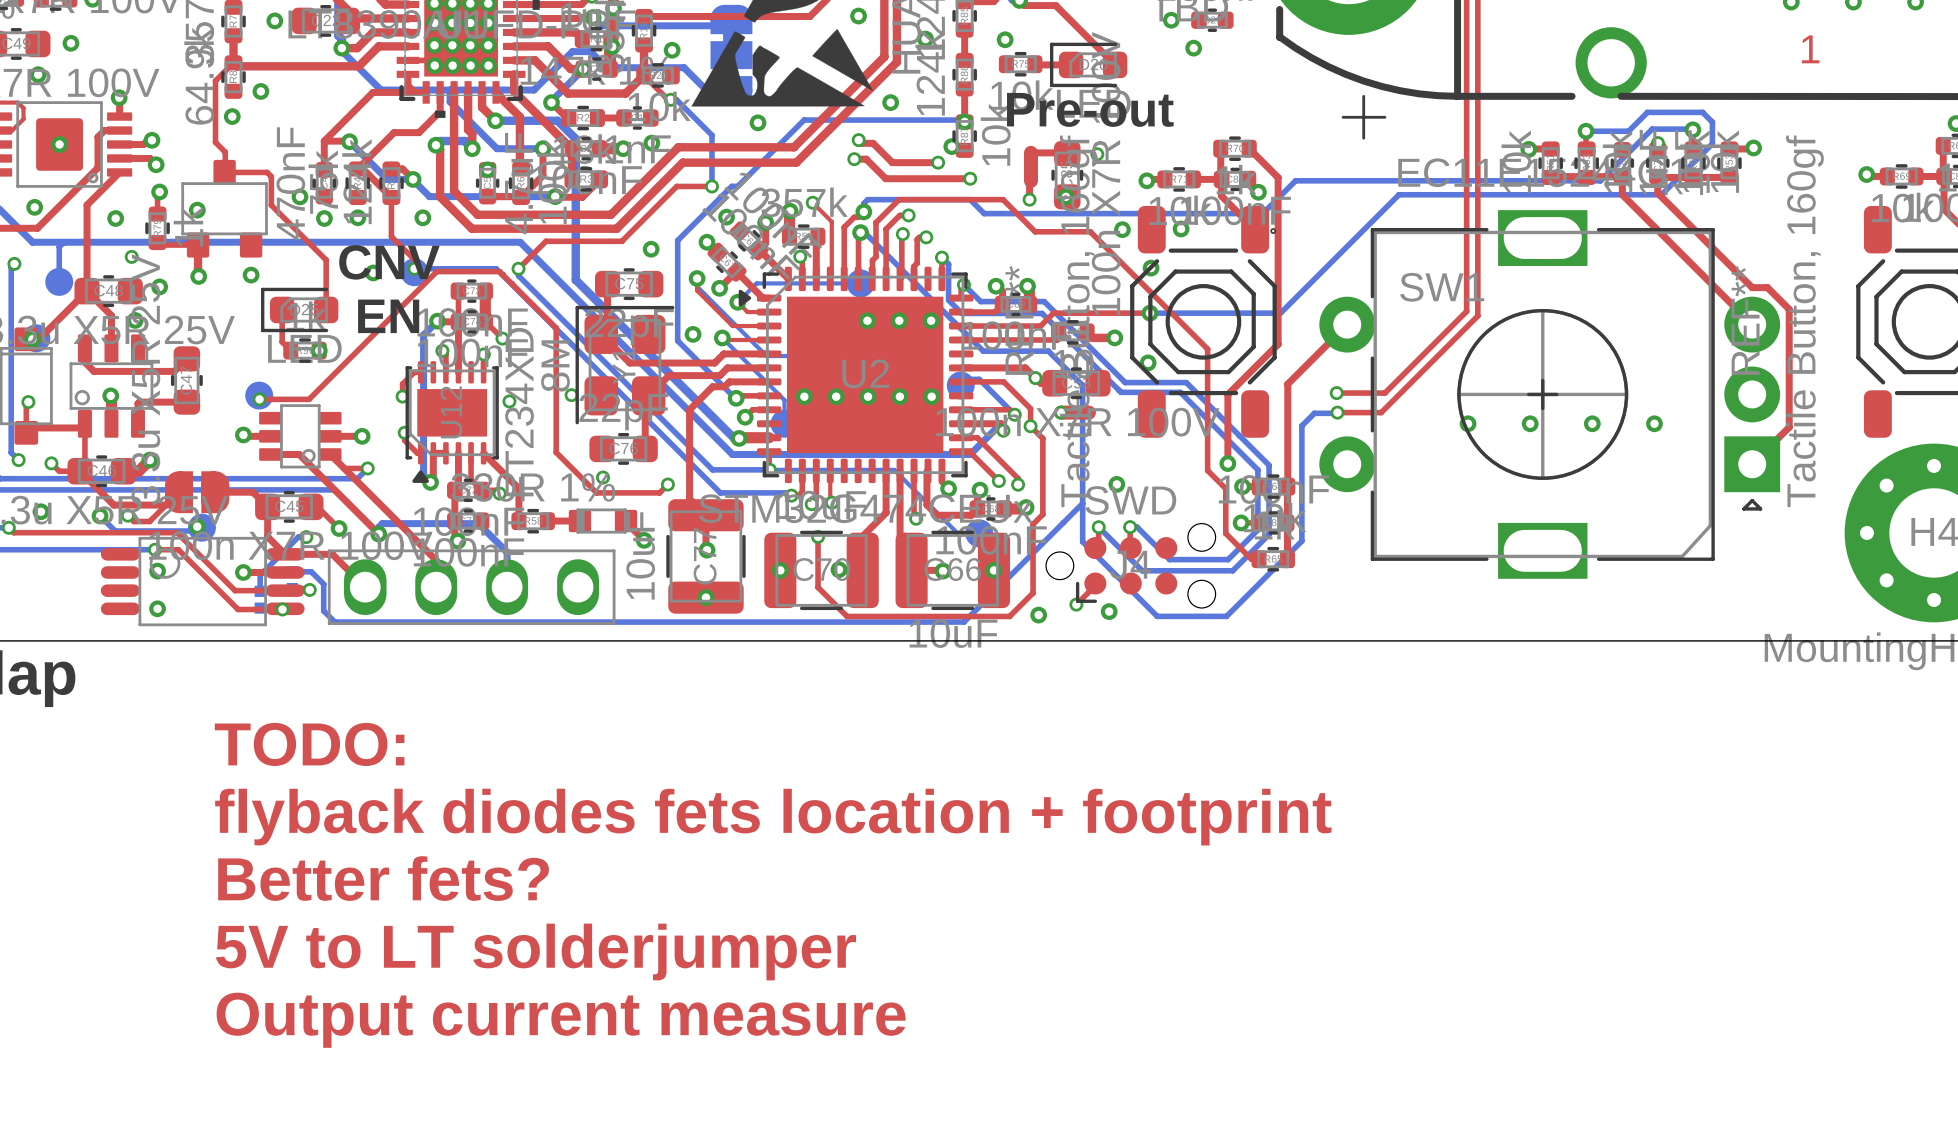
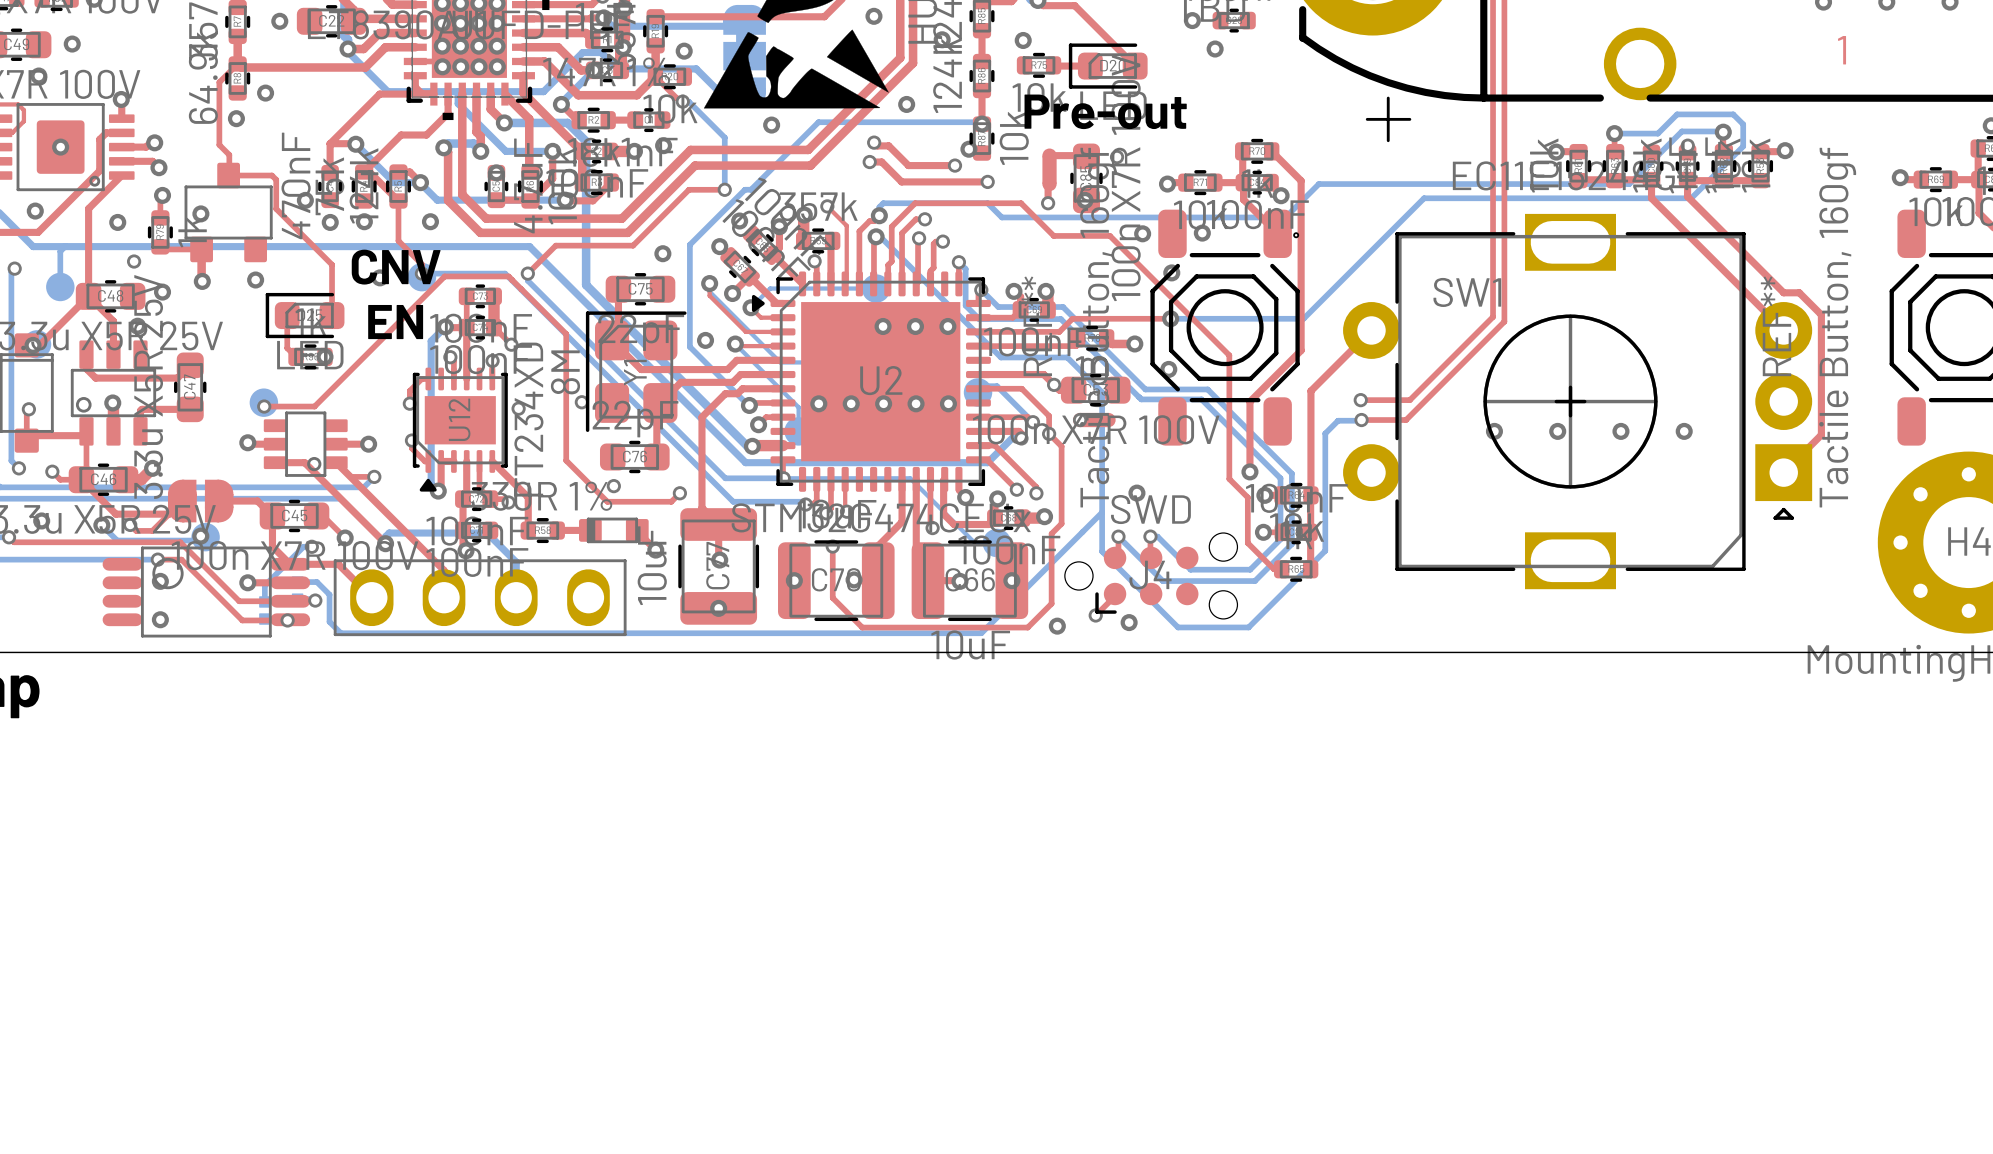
text: TODO: (309, 744) -> none
text: flyback diodes fets location + footprint (773, 817) -> none
text: Better fets? (383, 878) -> none
text: 5V to LT solderjumper (536, 952) -> none
text: Output current measure (561, 1020) -> none

